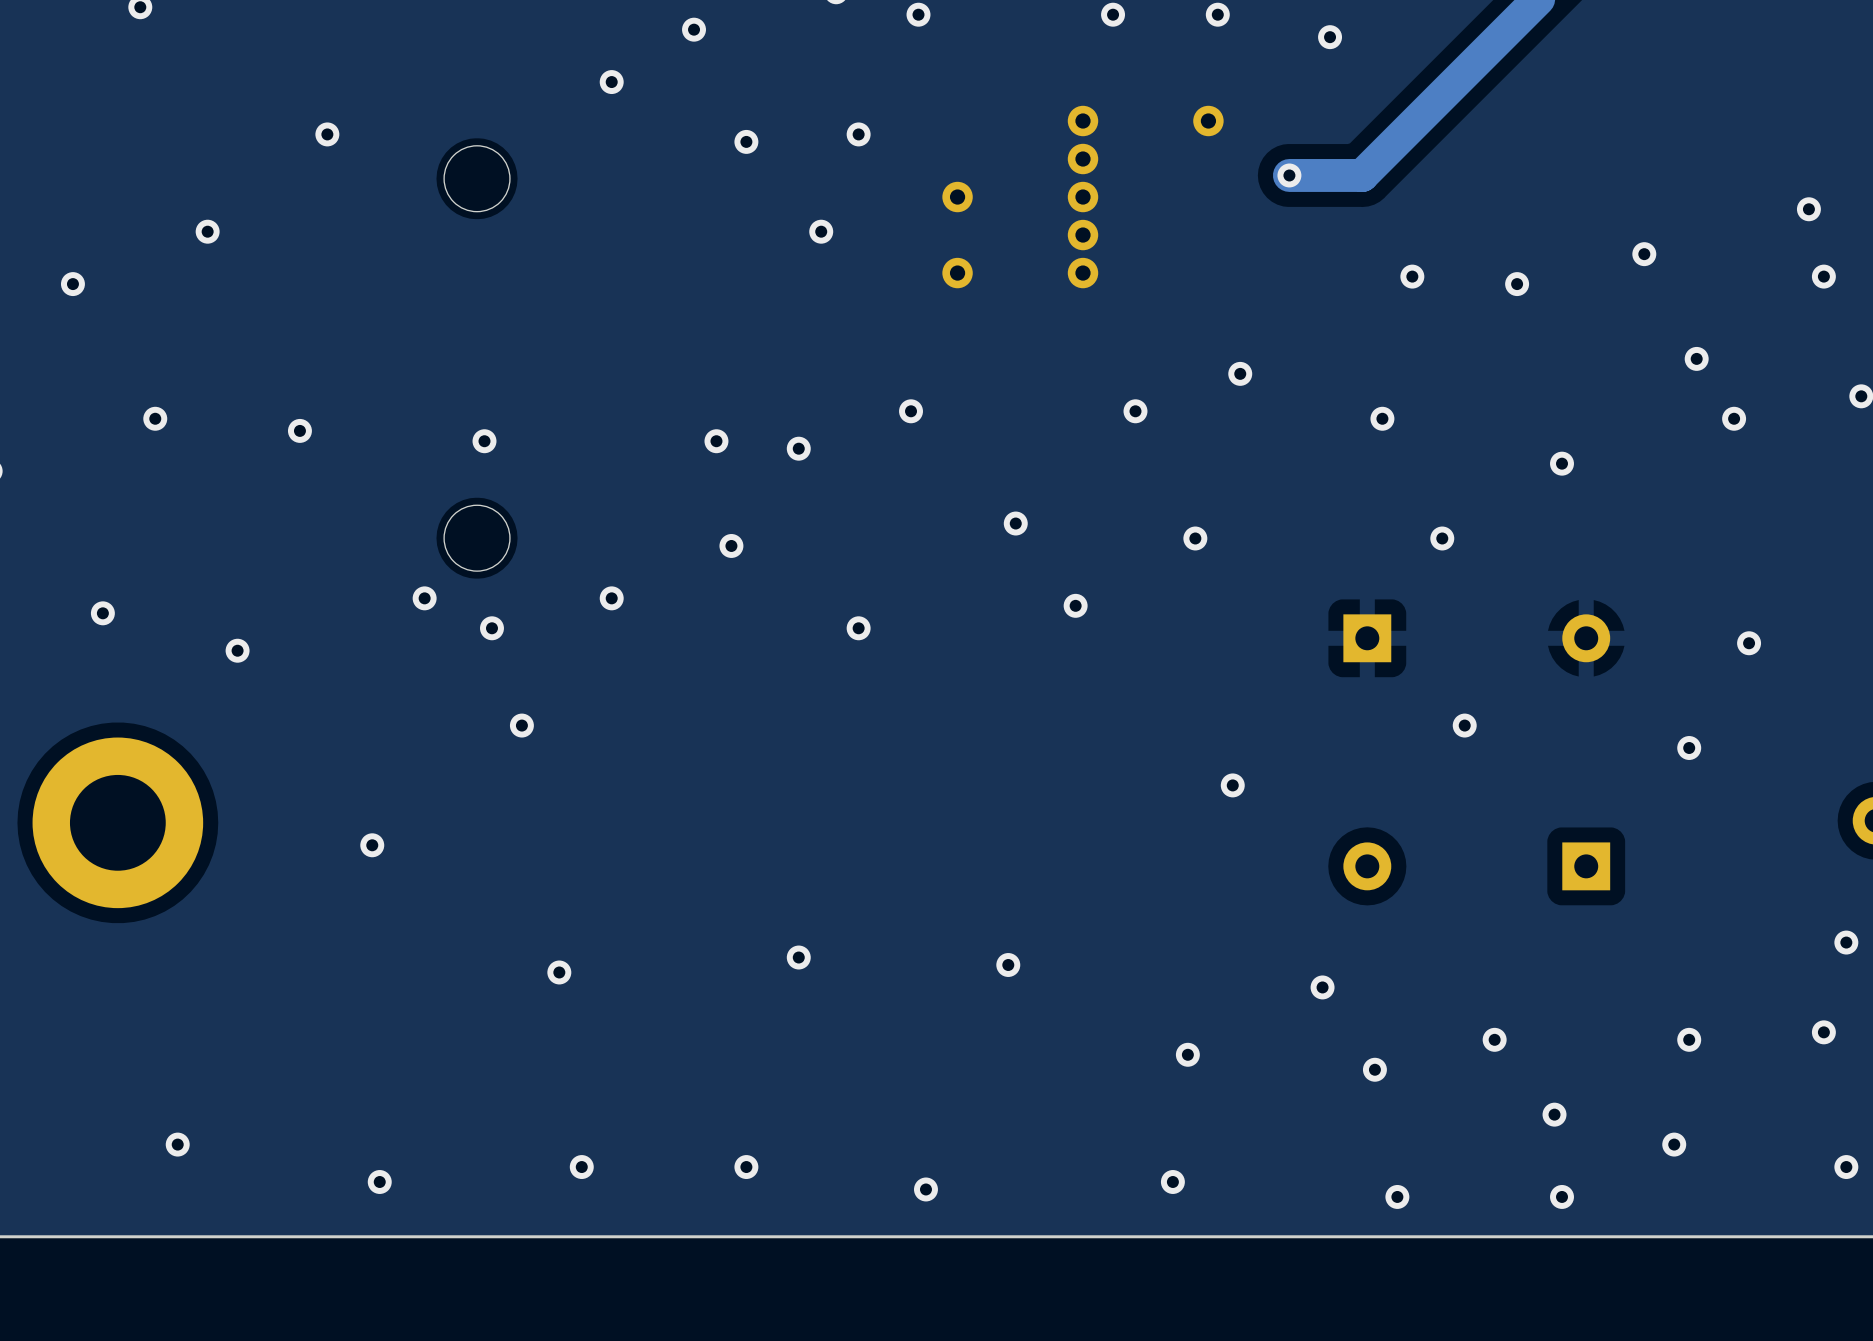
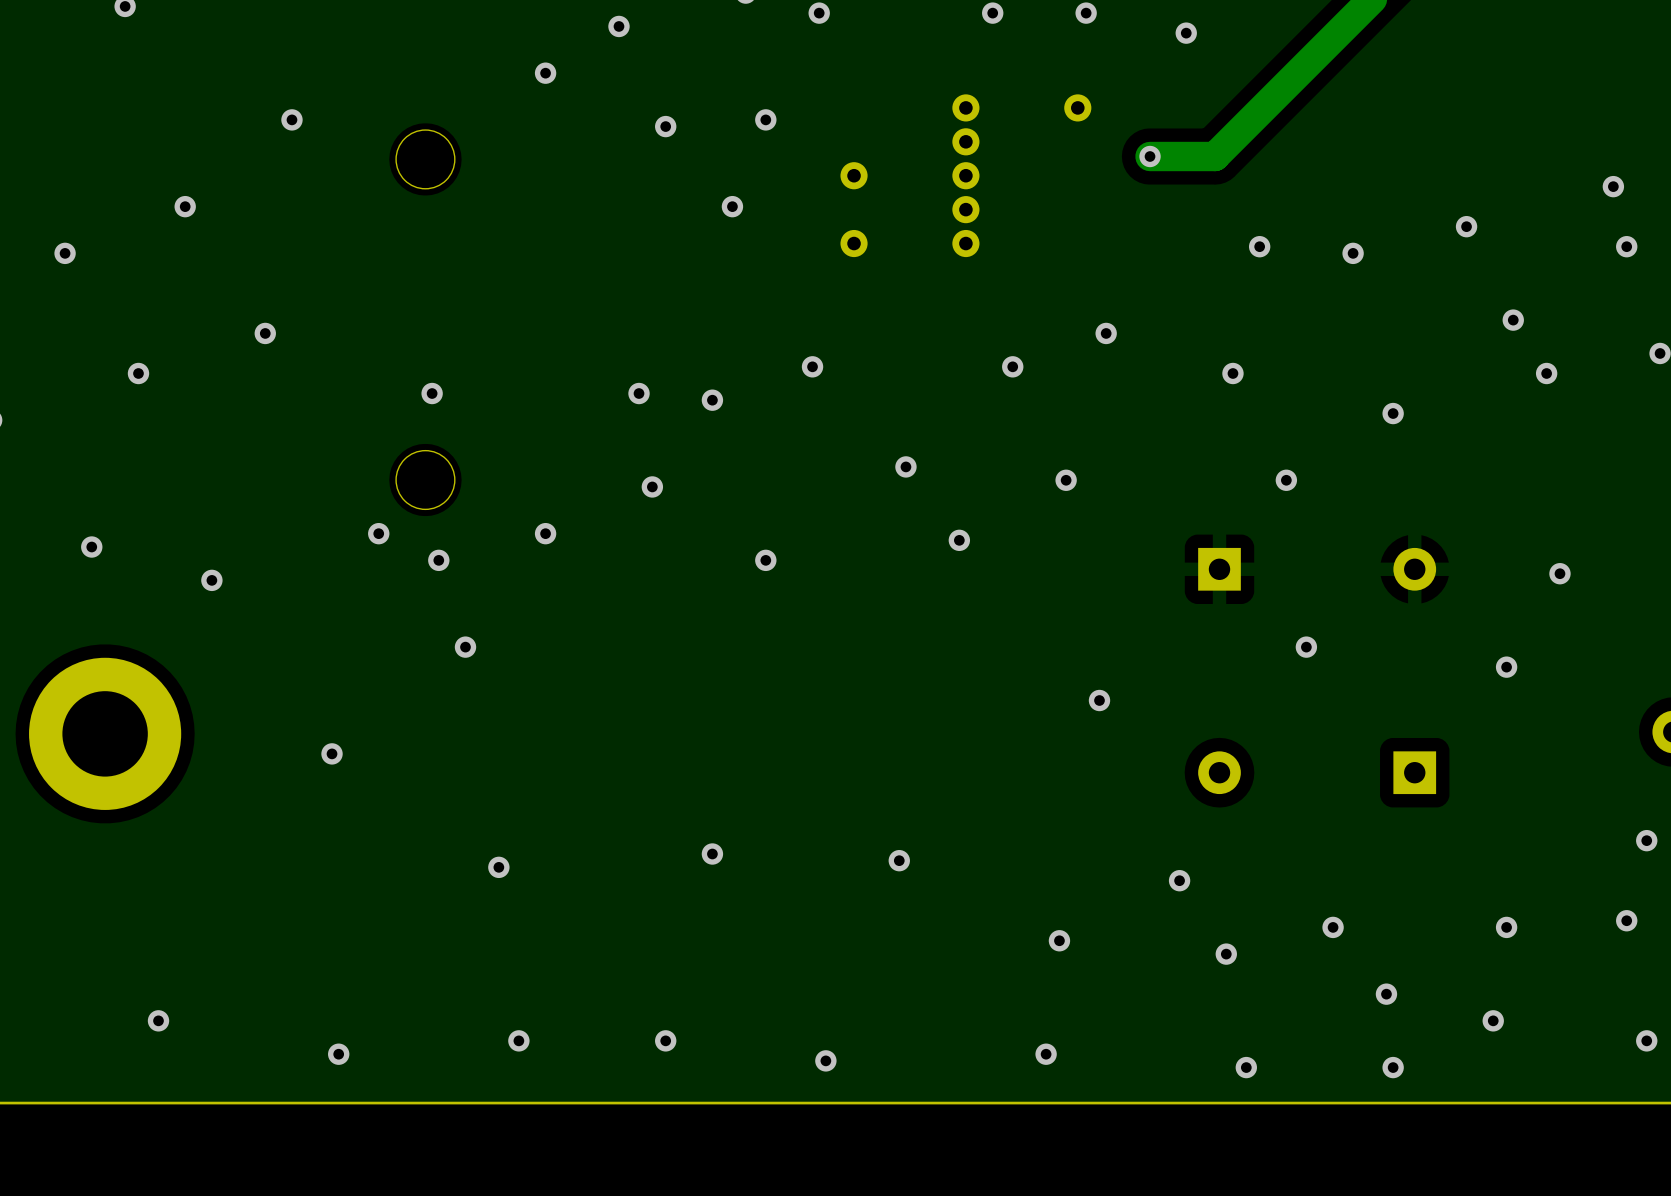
via position: (299, 430) -> (265, 333)

